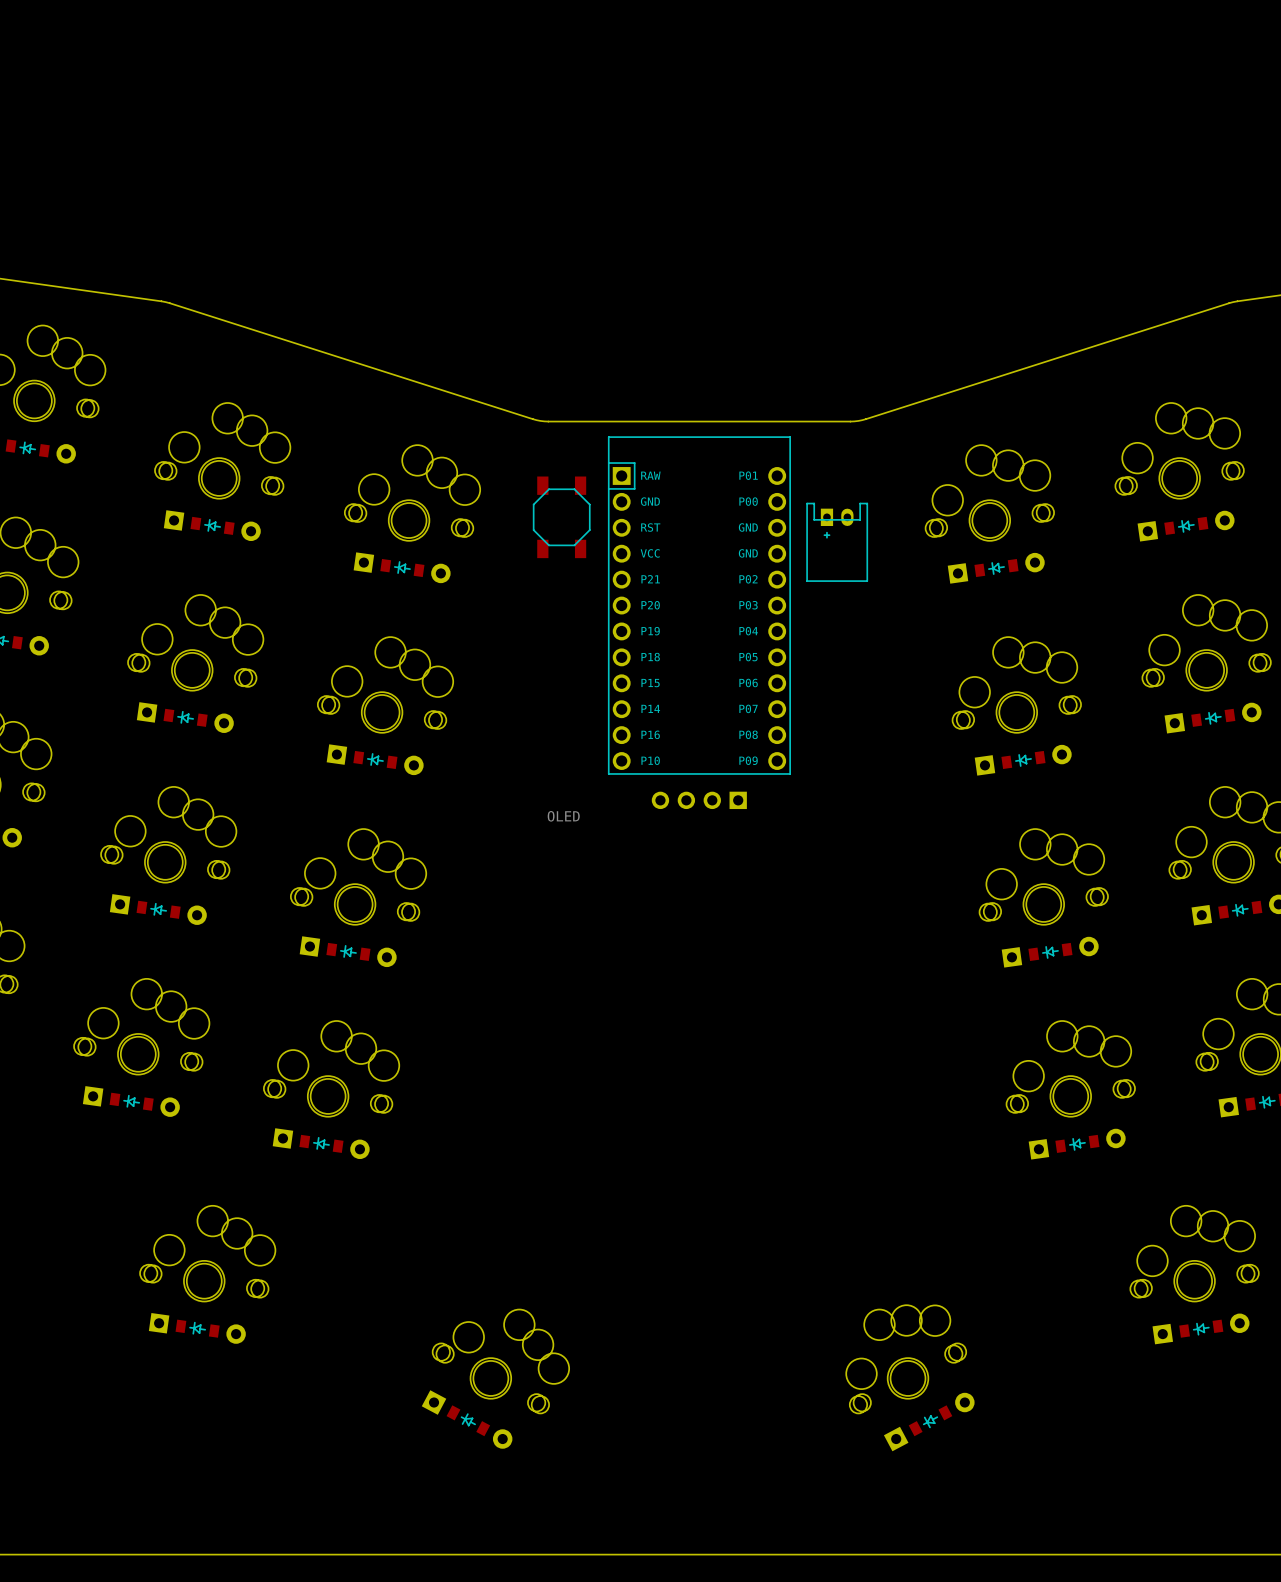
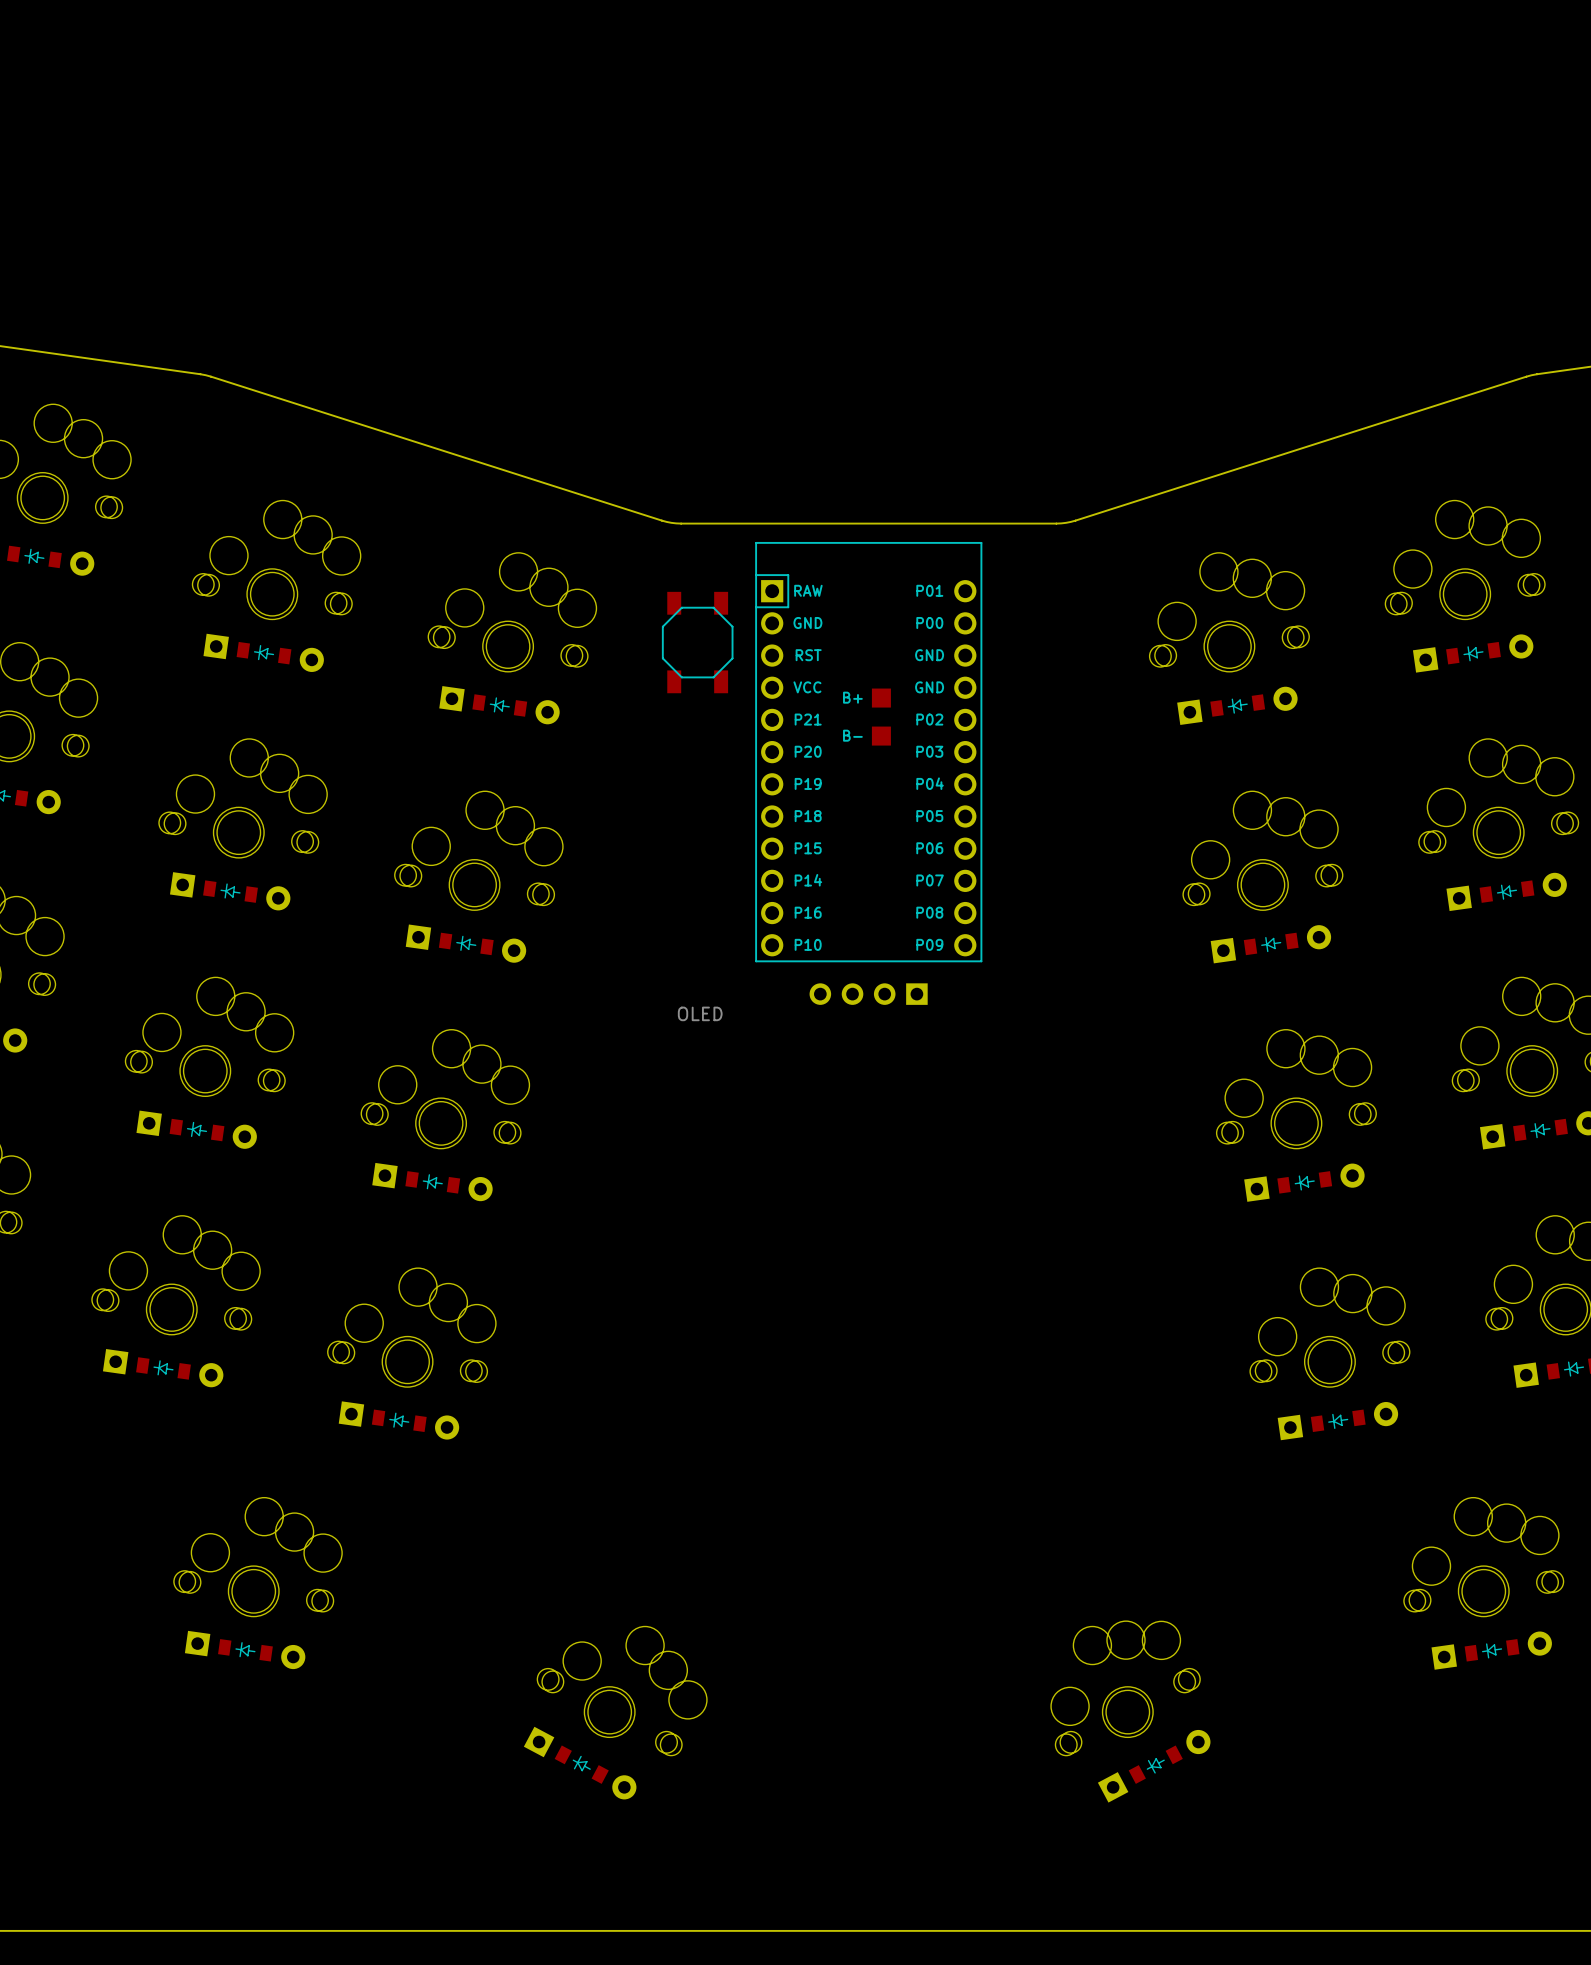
part: (837, 542) -> none
part: none -> (881, 698)
part: none -> (881, 736)

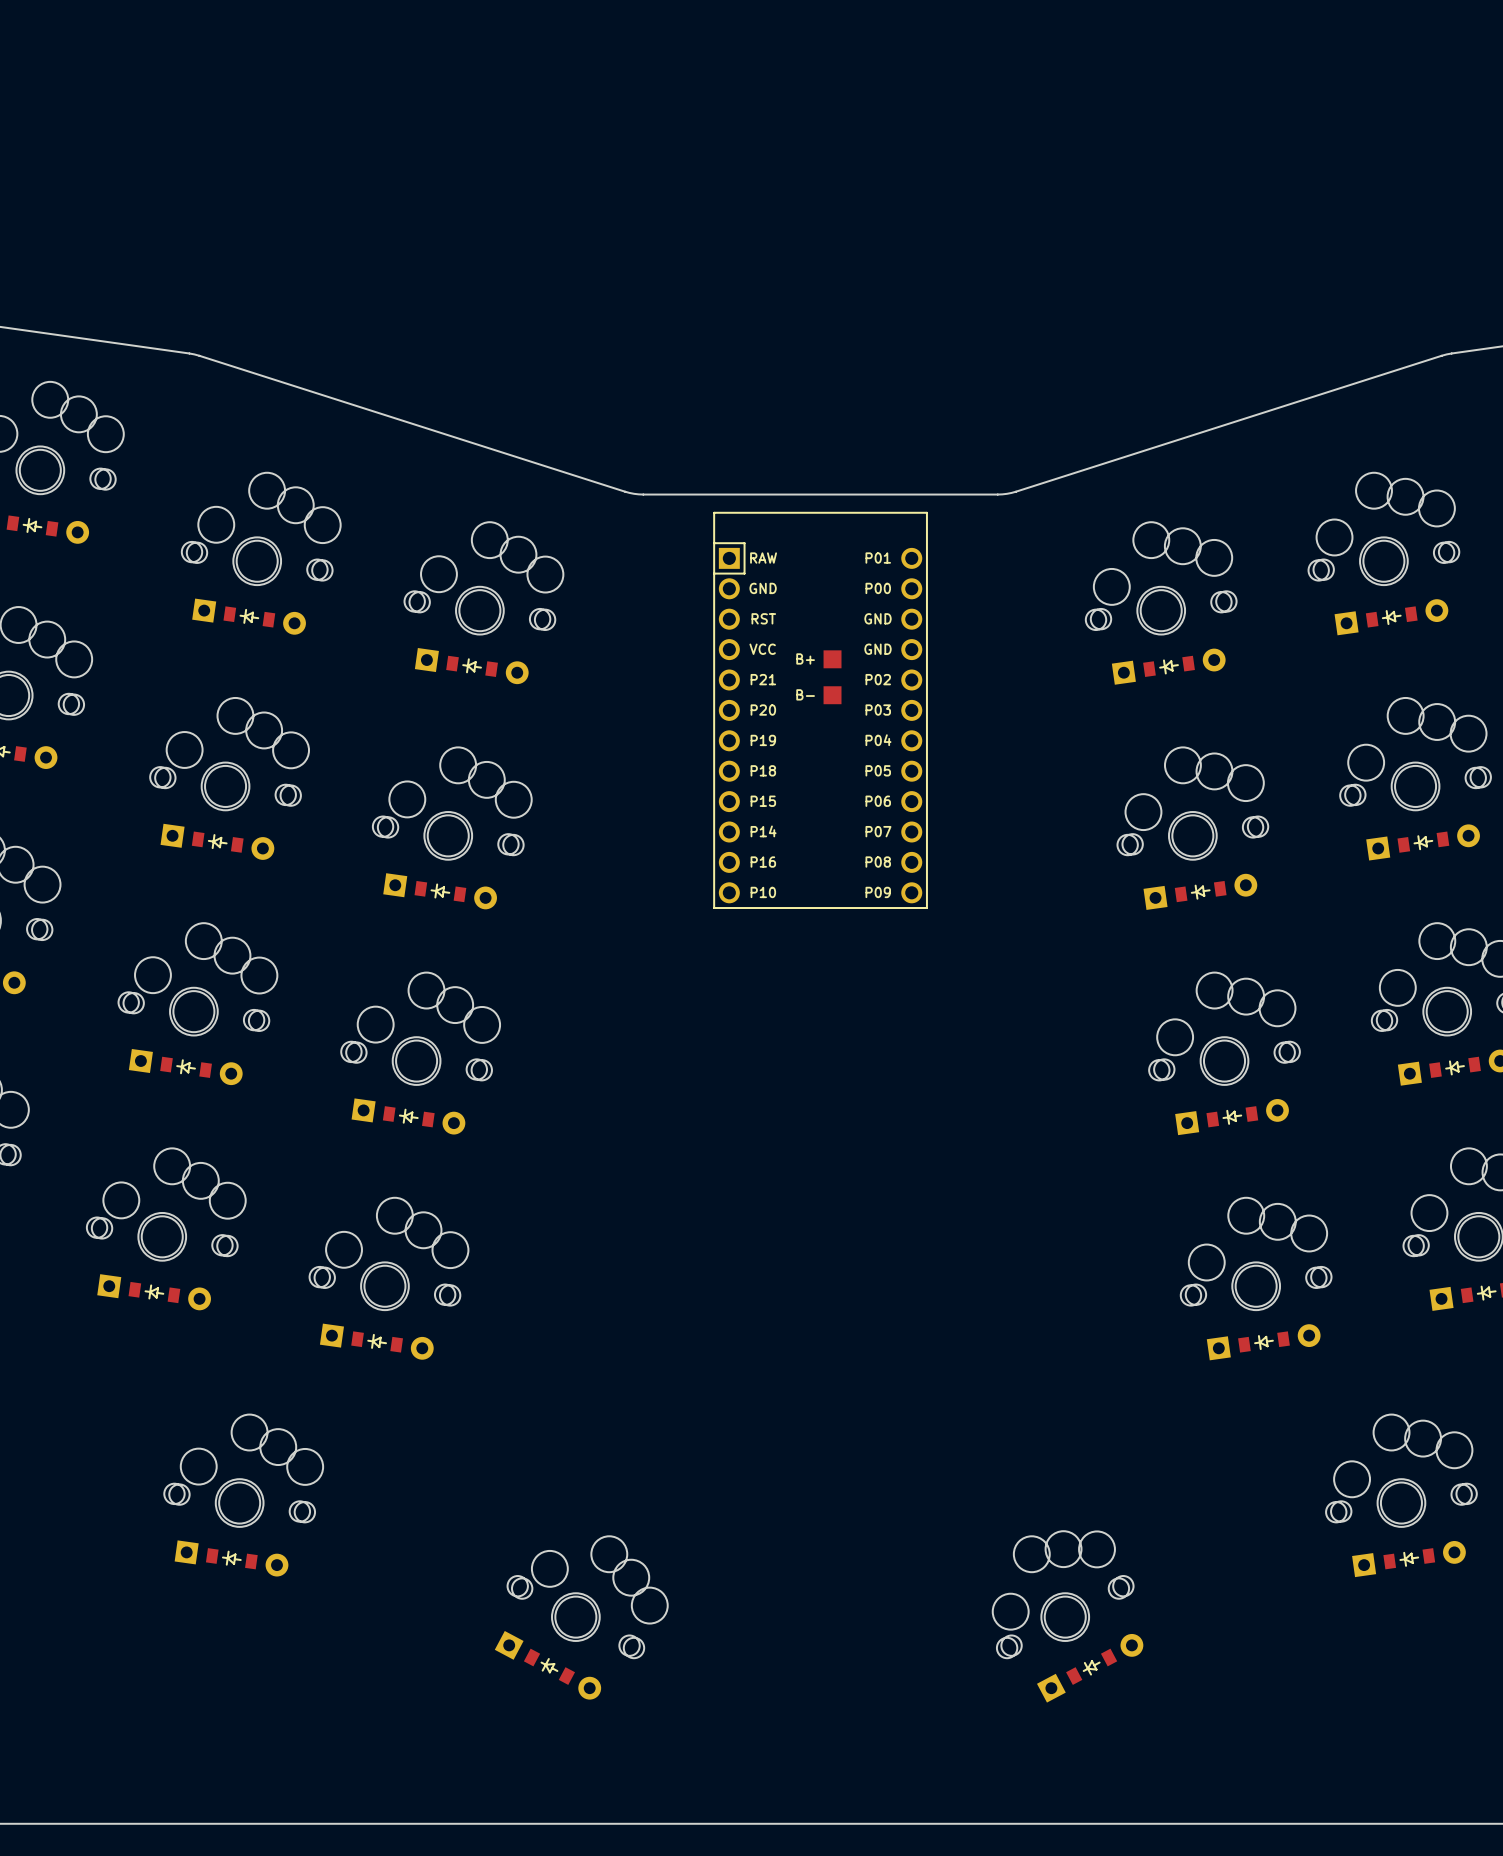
part: (697, 642) -> none
part: OLED (868, 994) -> none

